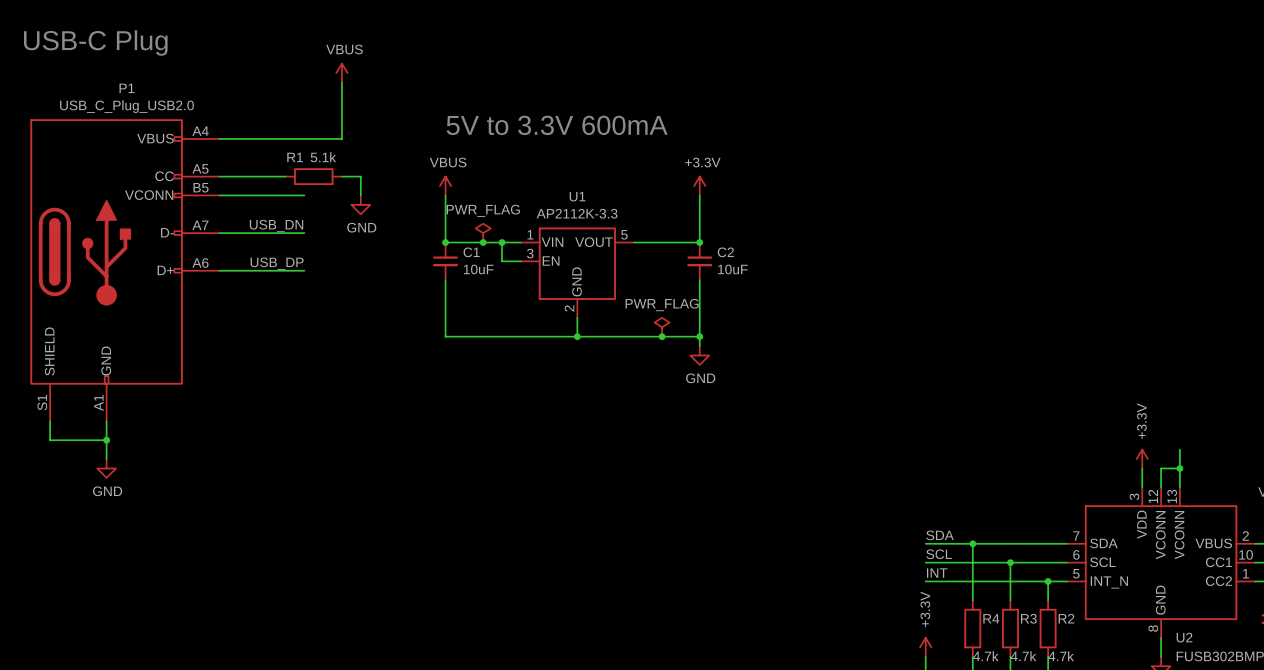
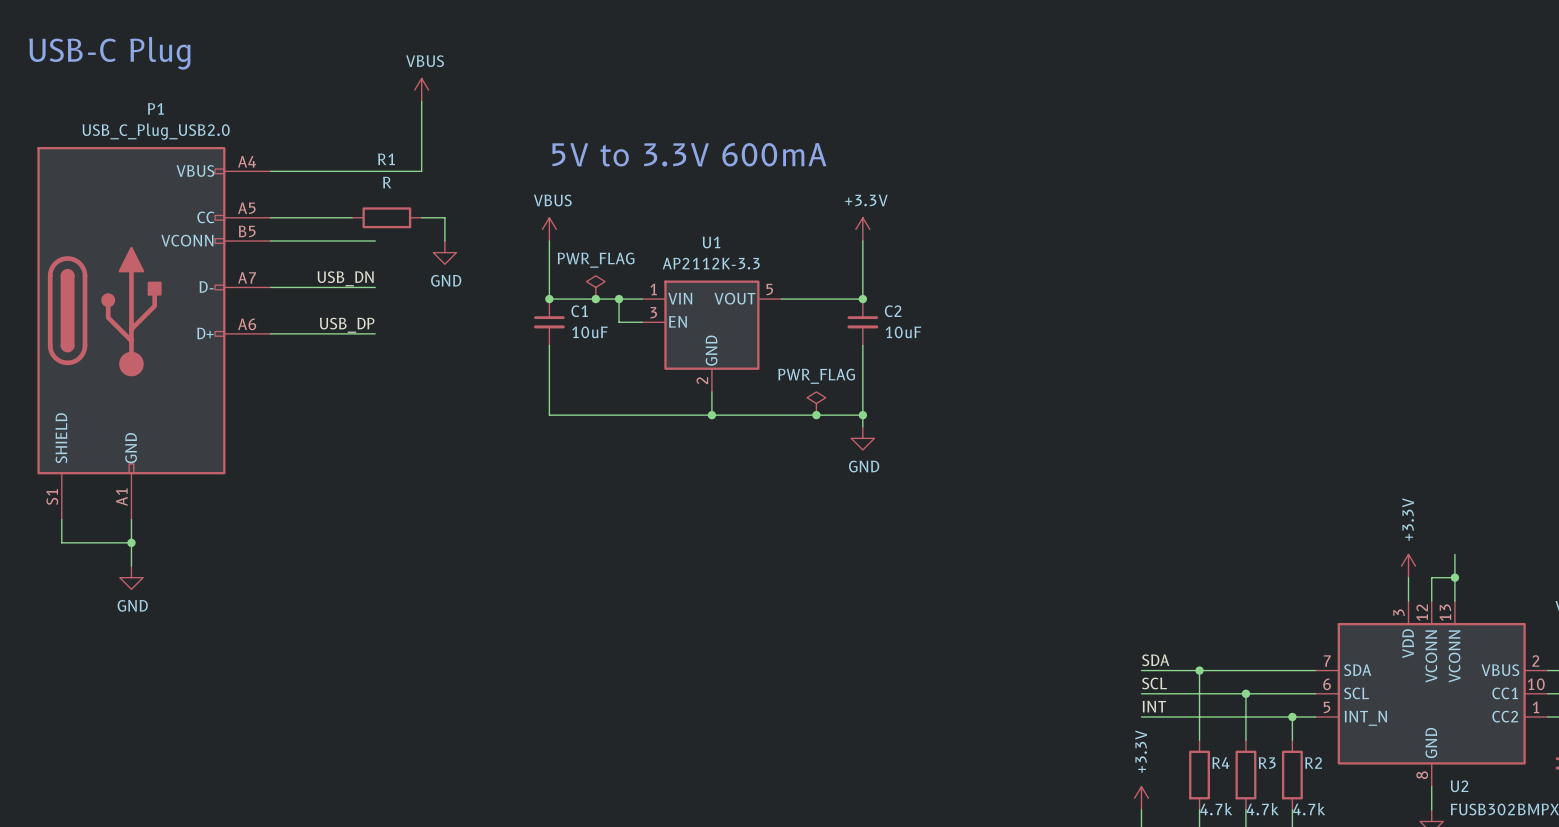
R1 name position: R1 (295, 157) -> R1 (386, 159)
R1 value: 5.1k (323, 157) -> R (387, 182)

